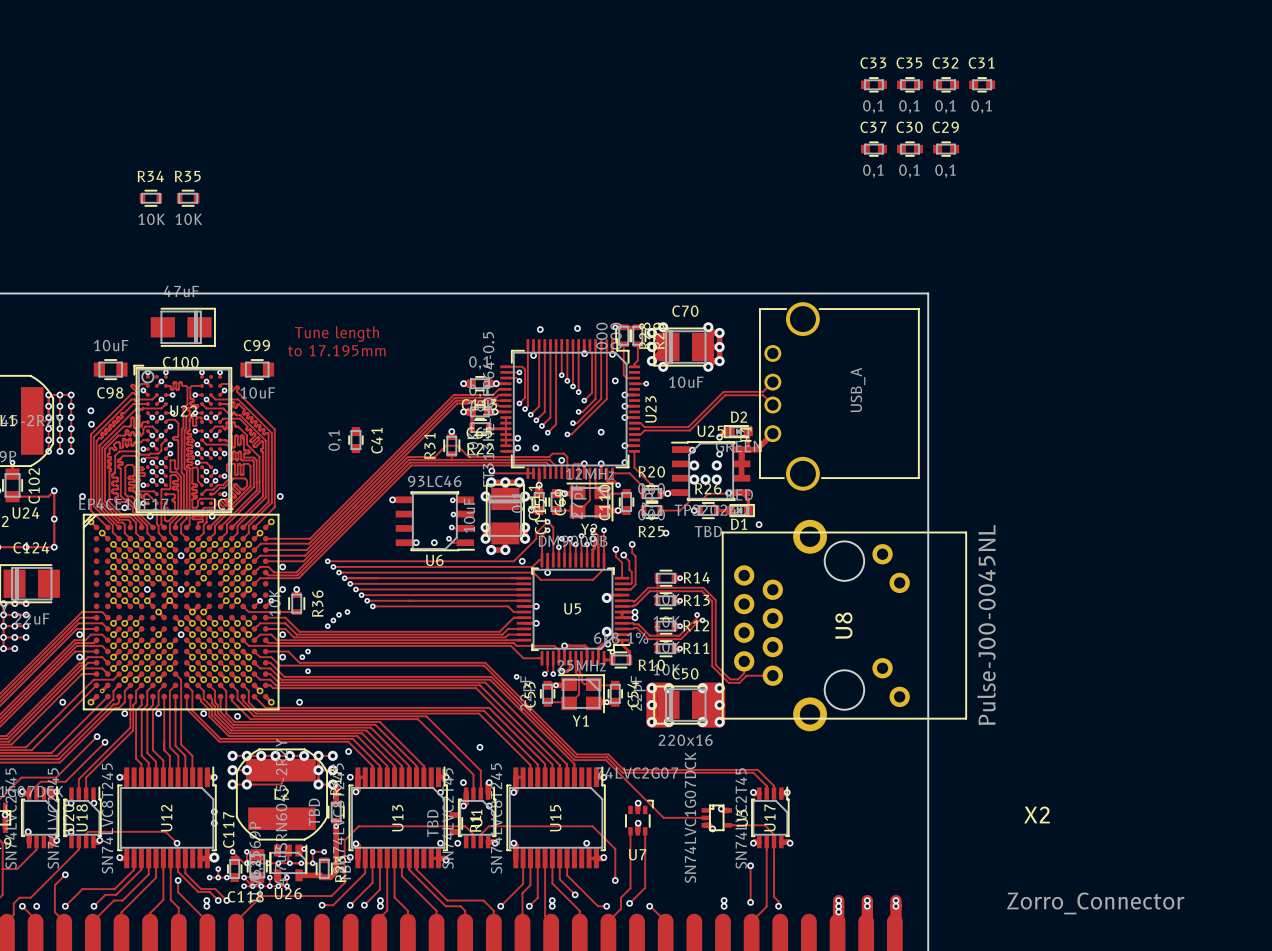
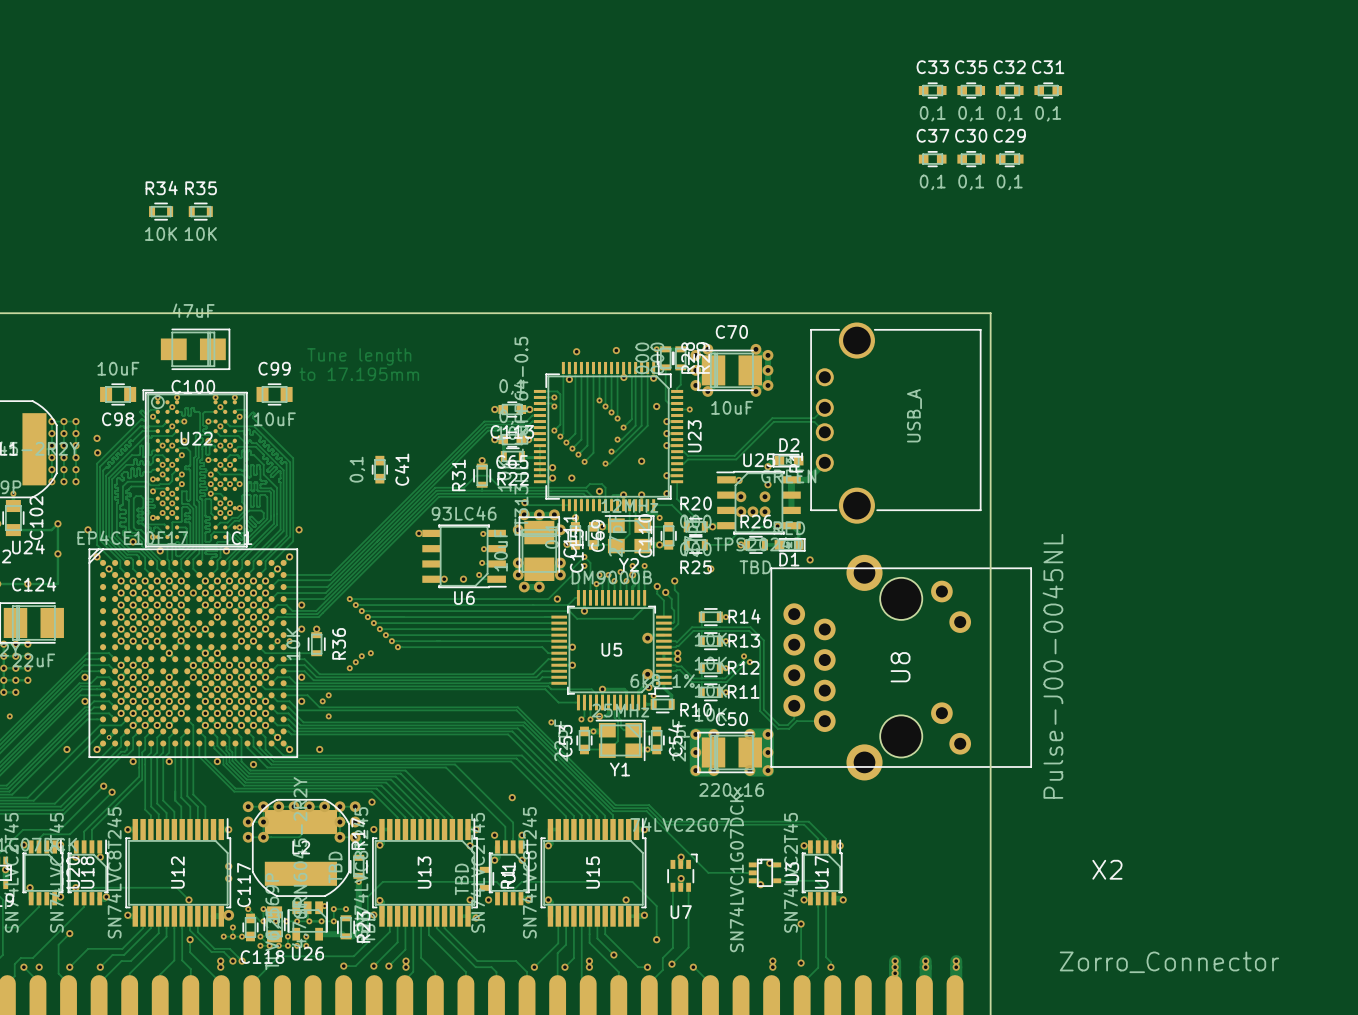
via: (54, 547) -> none
via: none -> (9, 716)

